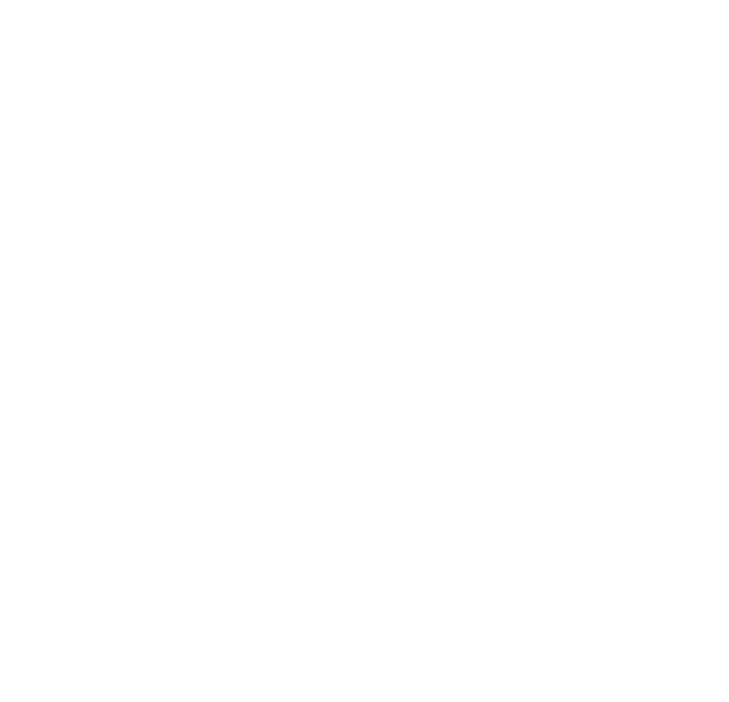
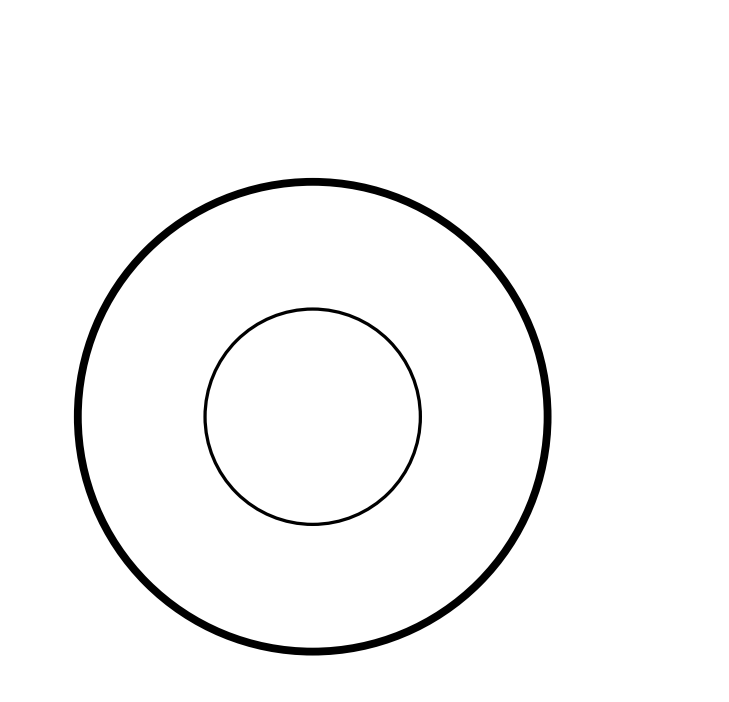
drawing: none -> [73, 177, 552, 656]
round board edge: none -> [203, 307, 422, 527]

